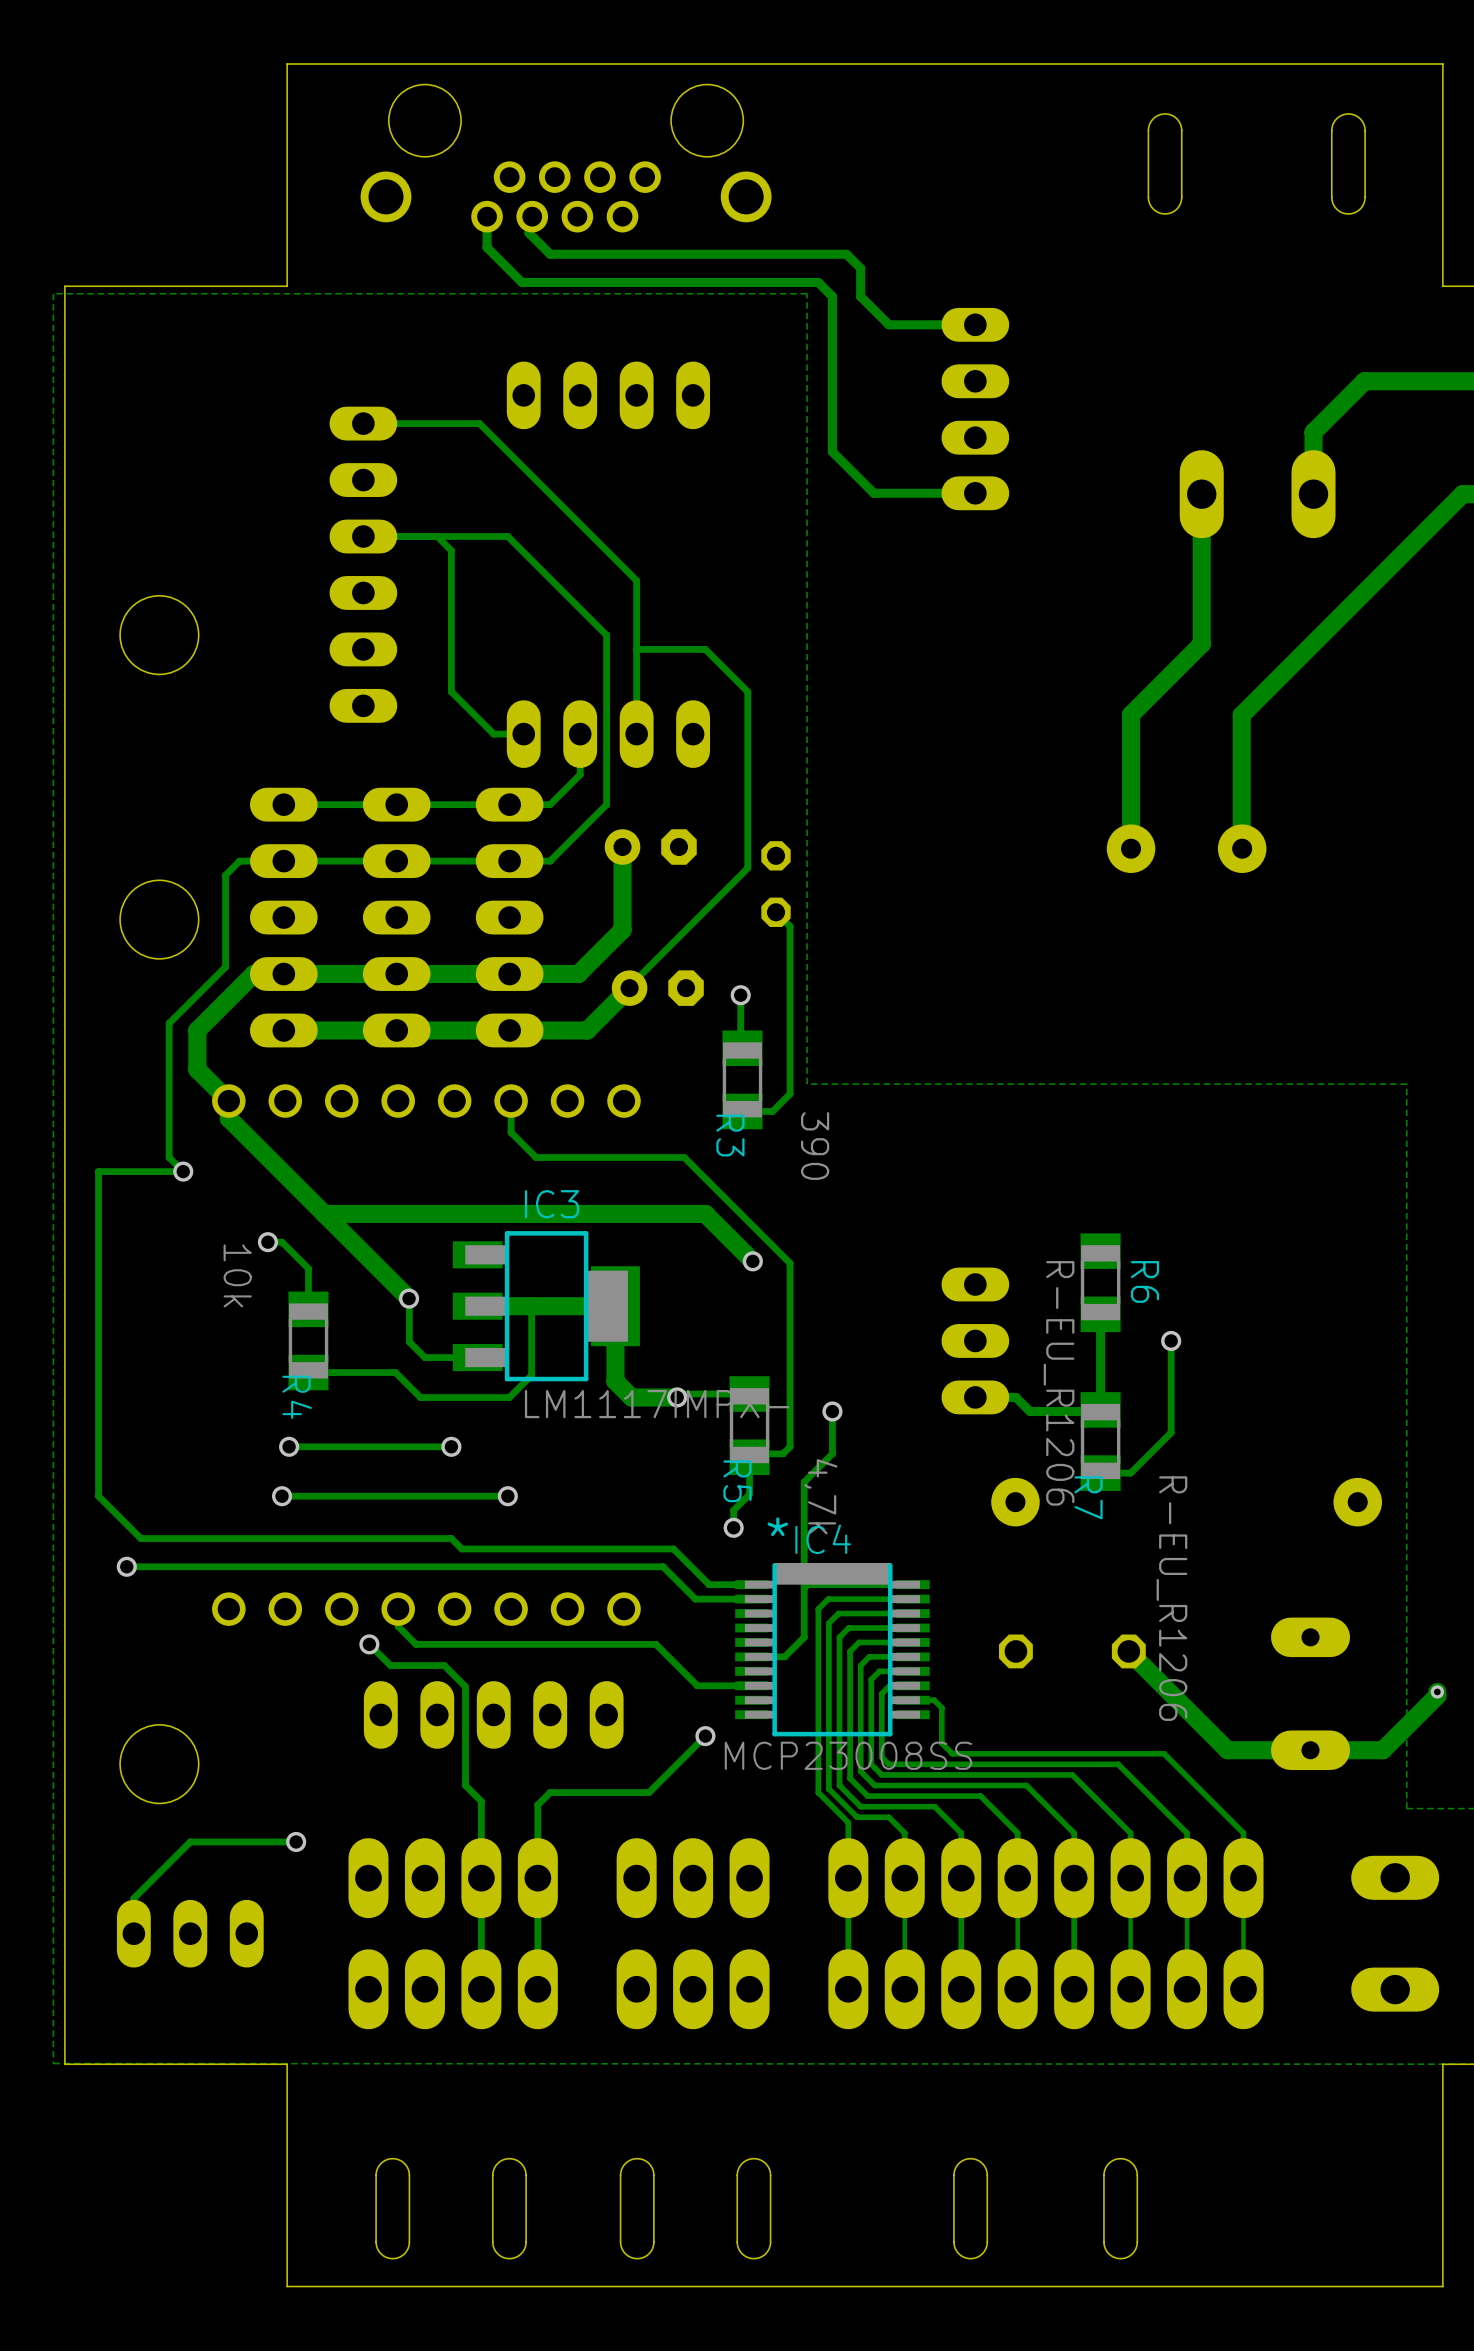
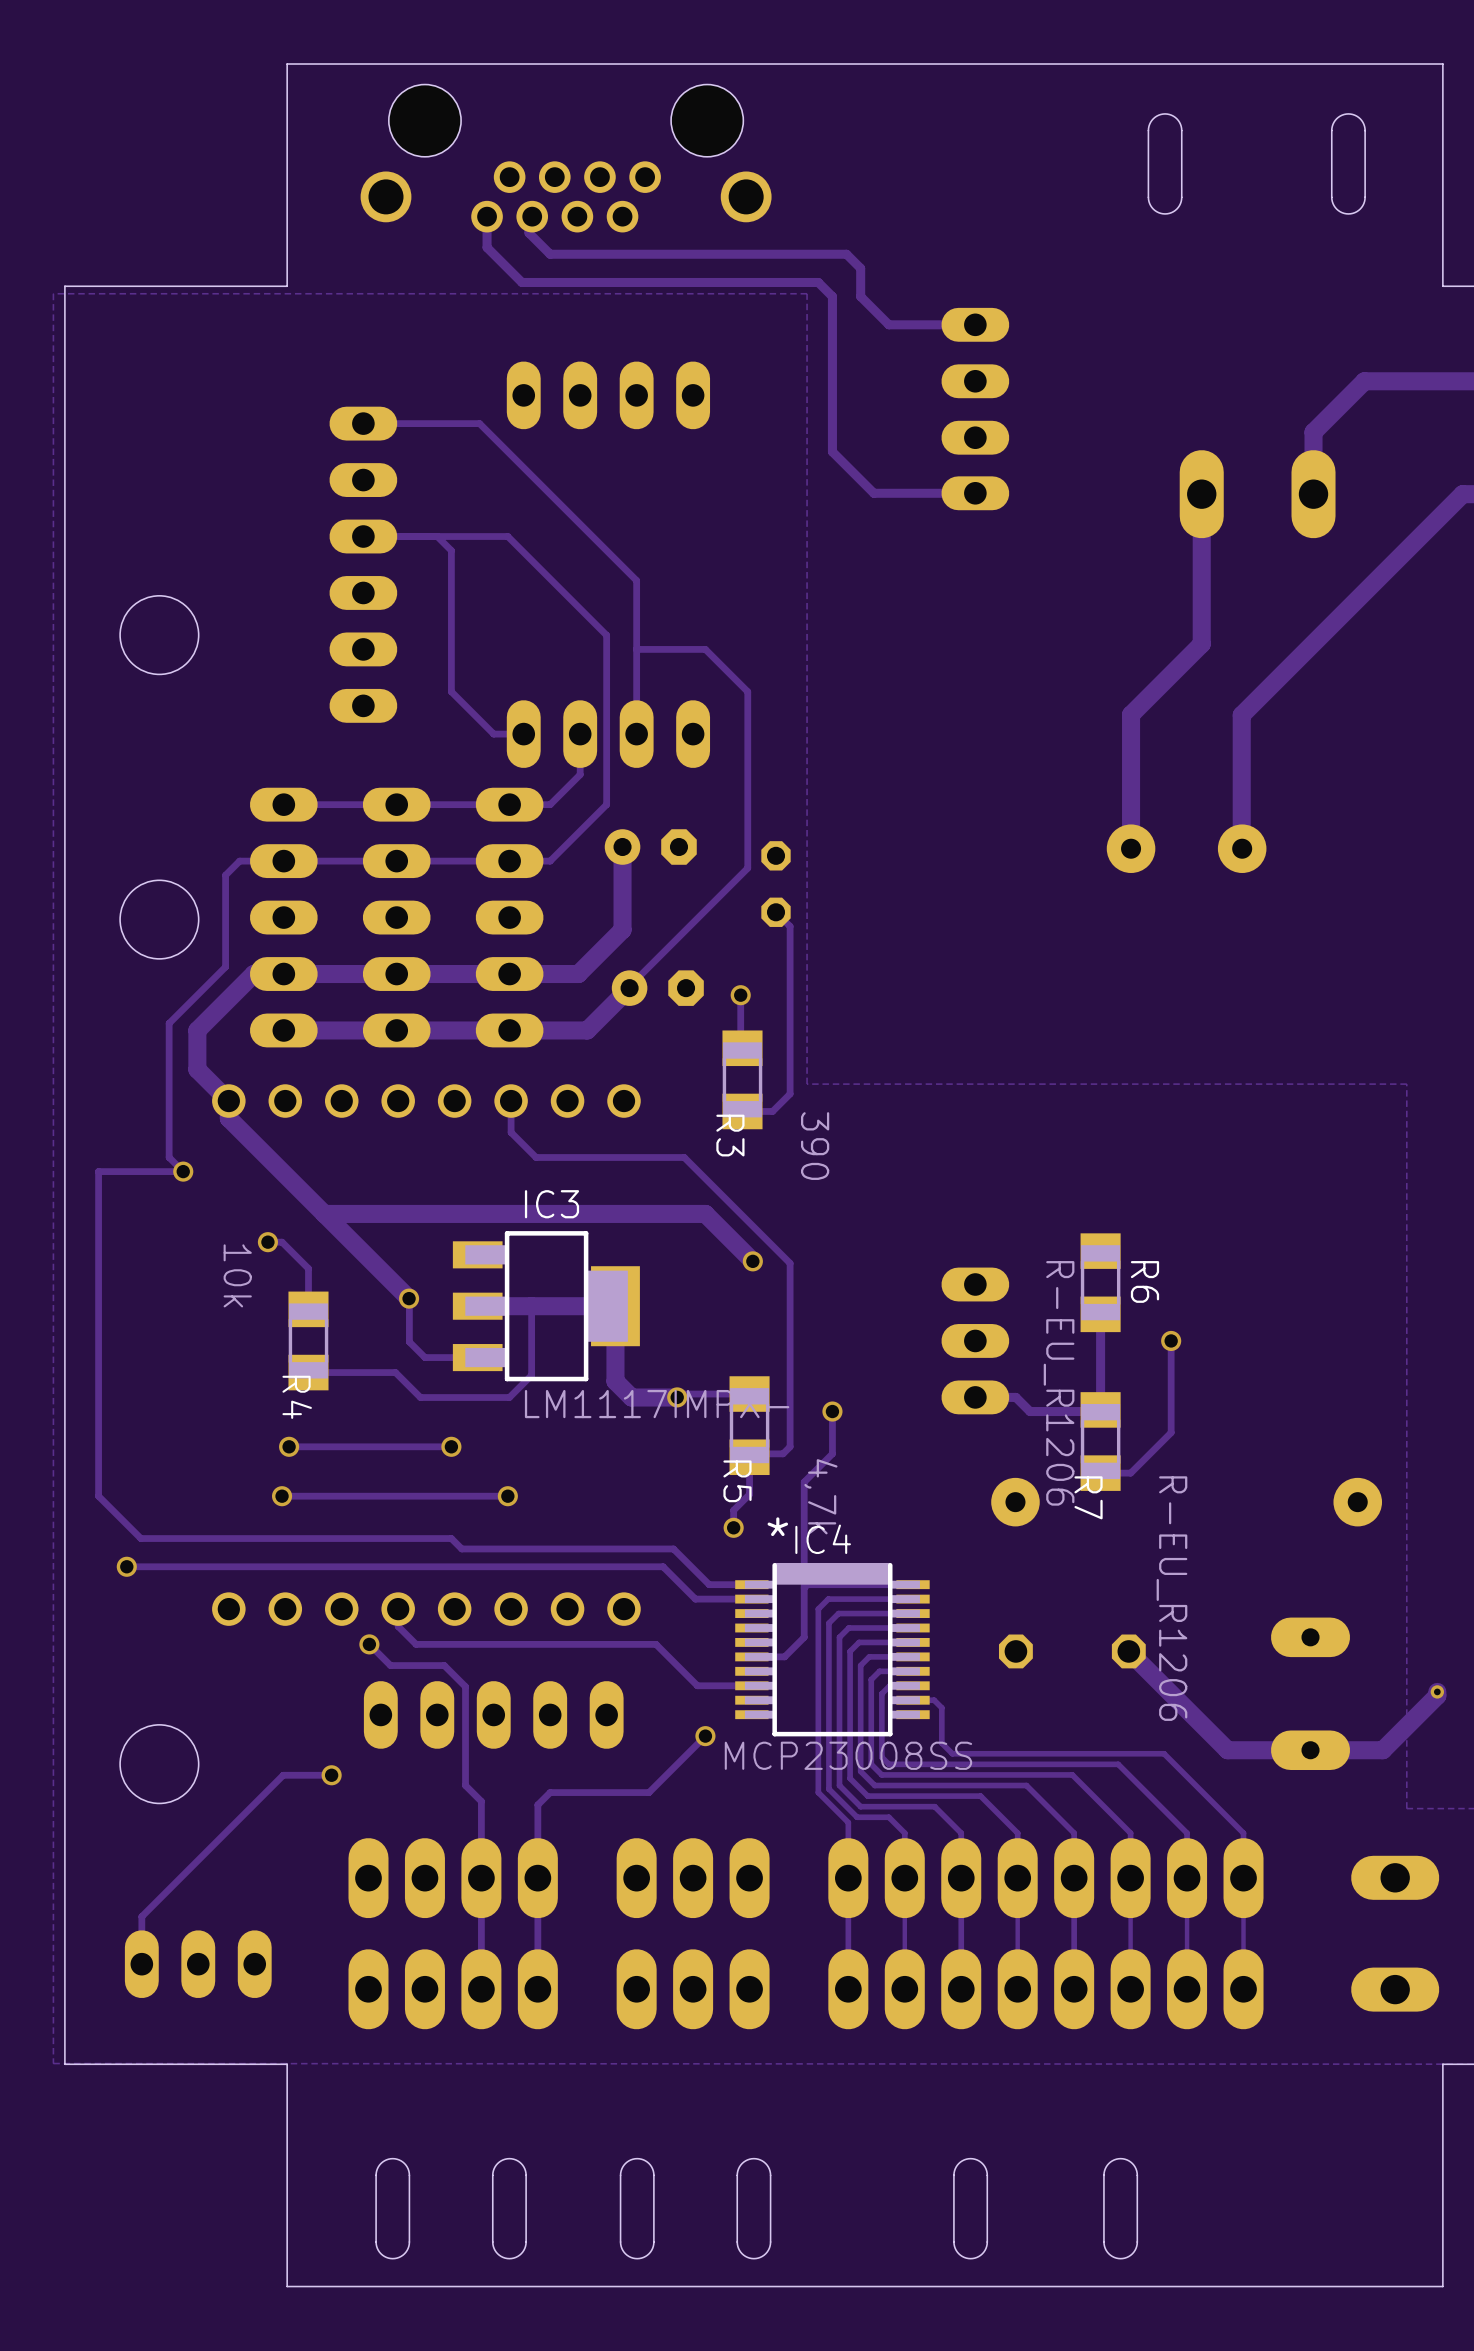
track: none -> (331, 1775) (283, 1775) (141, 1916) (141, 1964)
track: (296, 1841) (190, 1841) (133, 1898) (133, 1933) -> none
via position: (296, 1841) -> (331, 1775)
part position: (190, 1933) -> (198, 1964)

